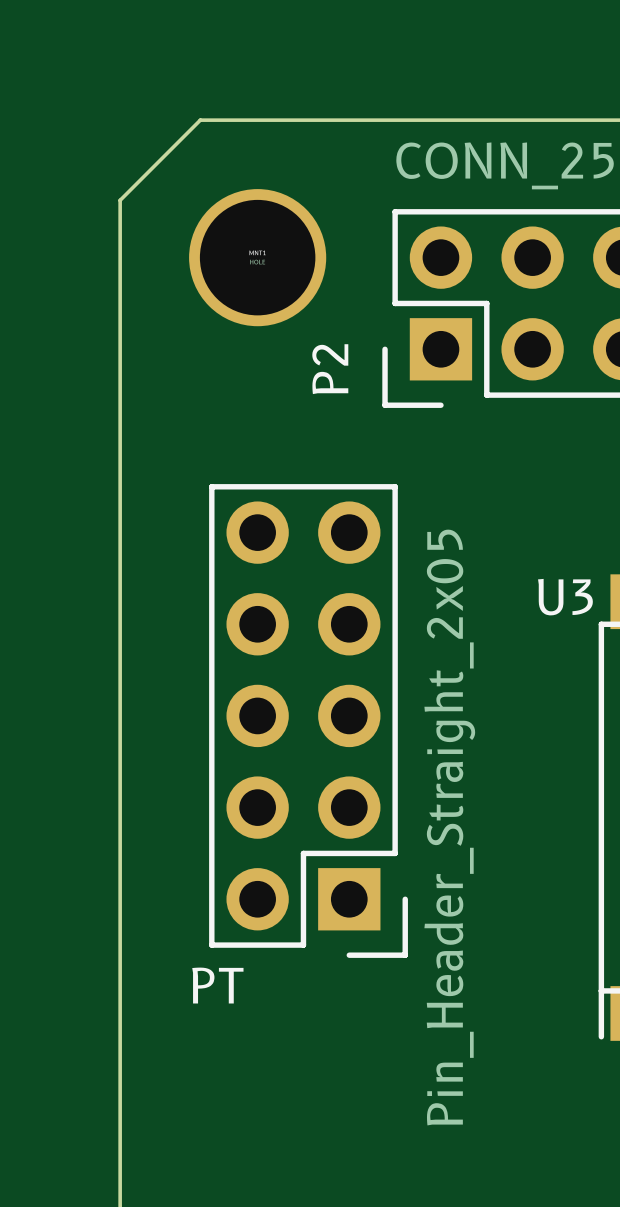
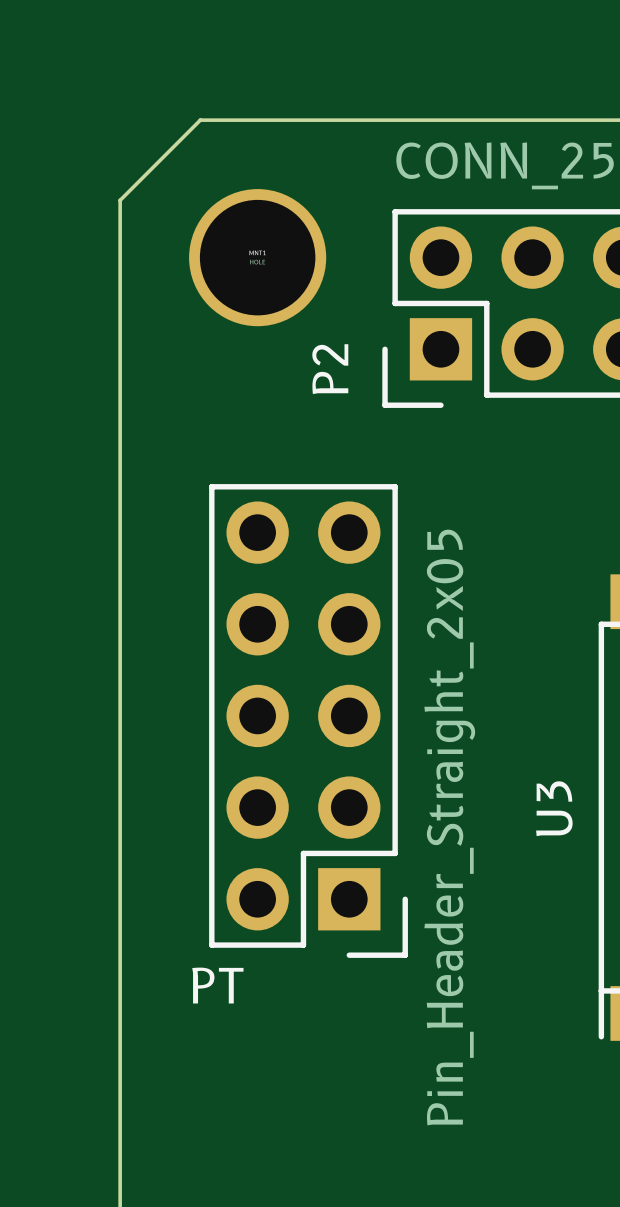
U3 name rotation: 0° (565, 597) -> 90° counterclockwise (554, 808)
U3 name position: U3 (565, 597) -> U3 (554, 808)

